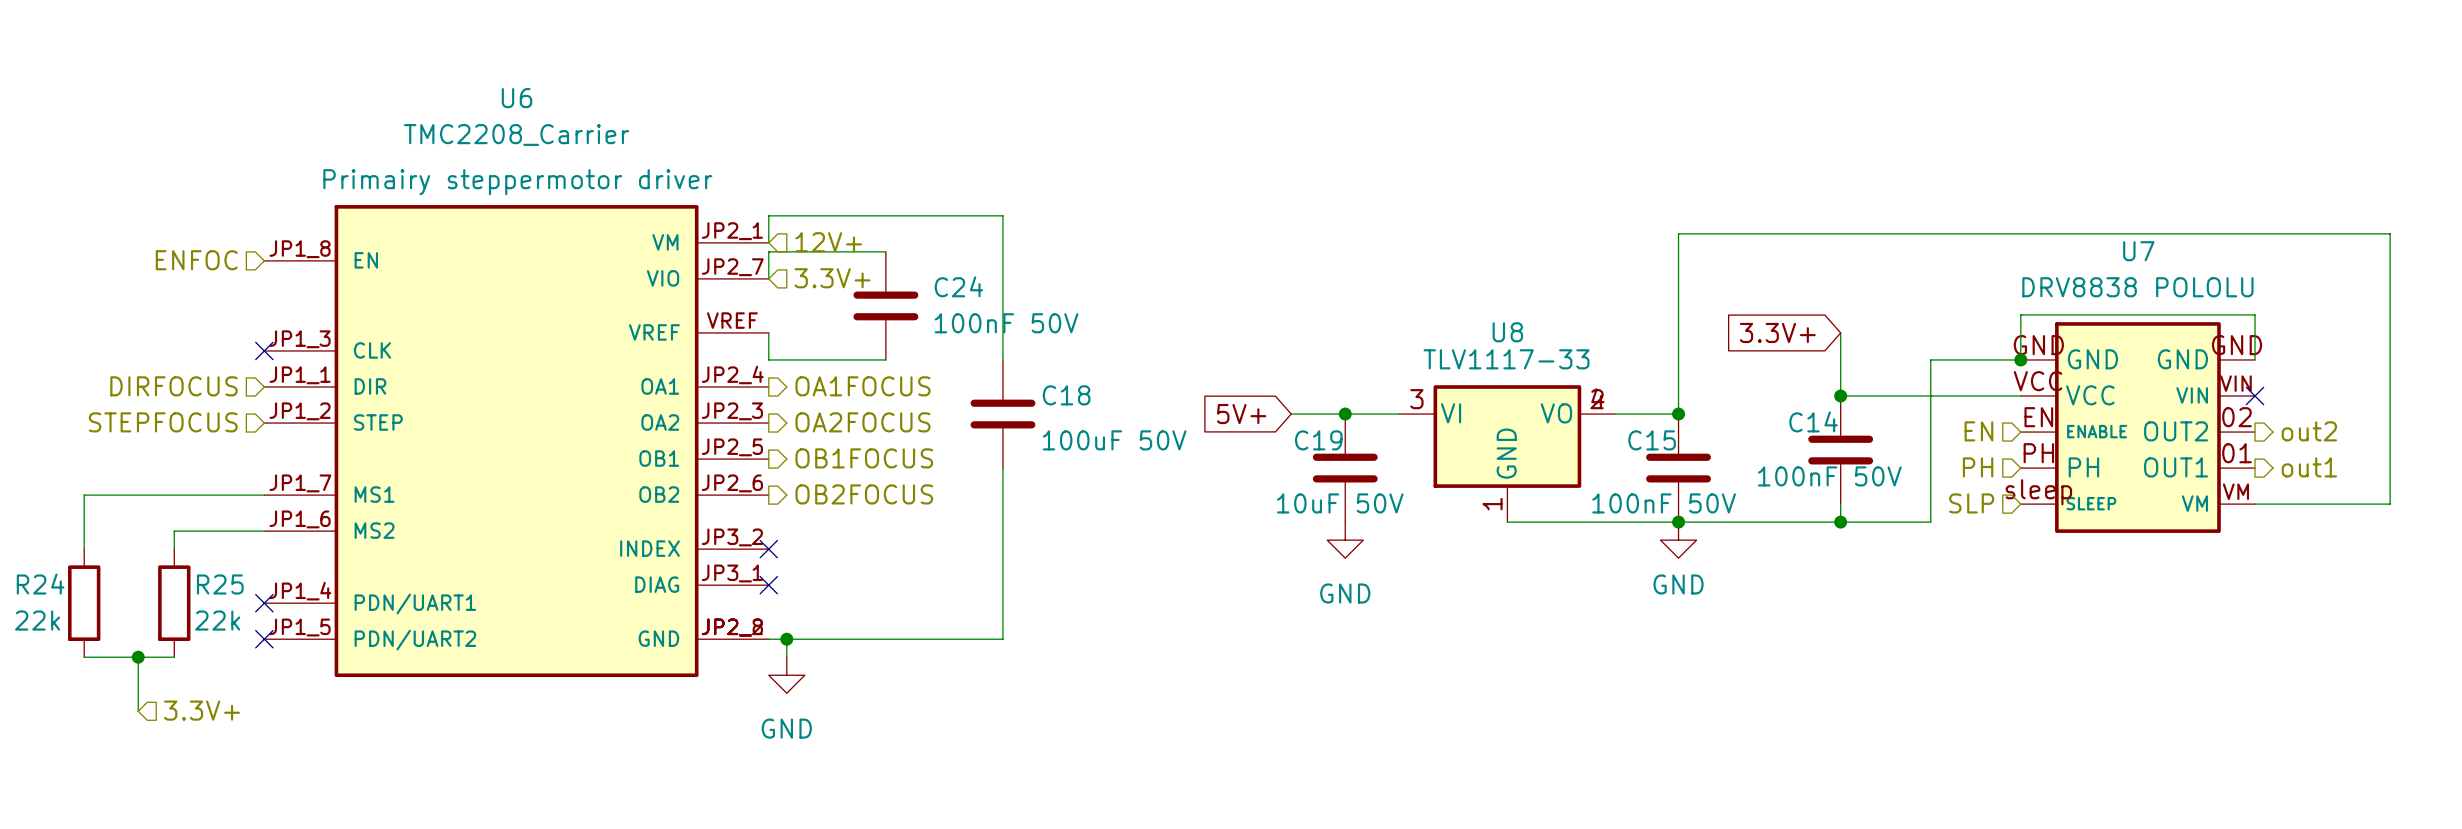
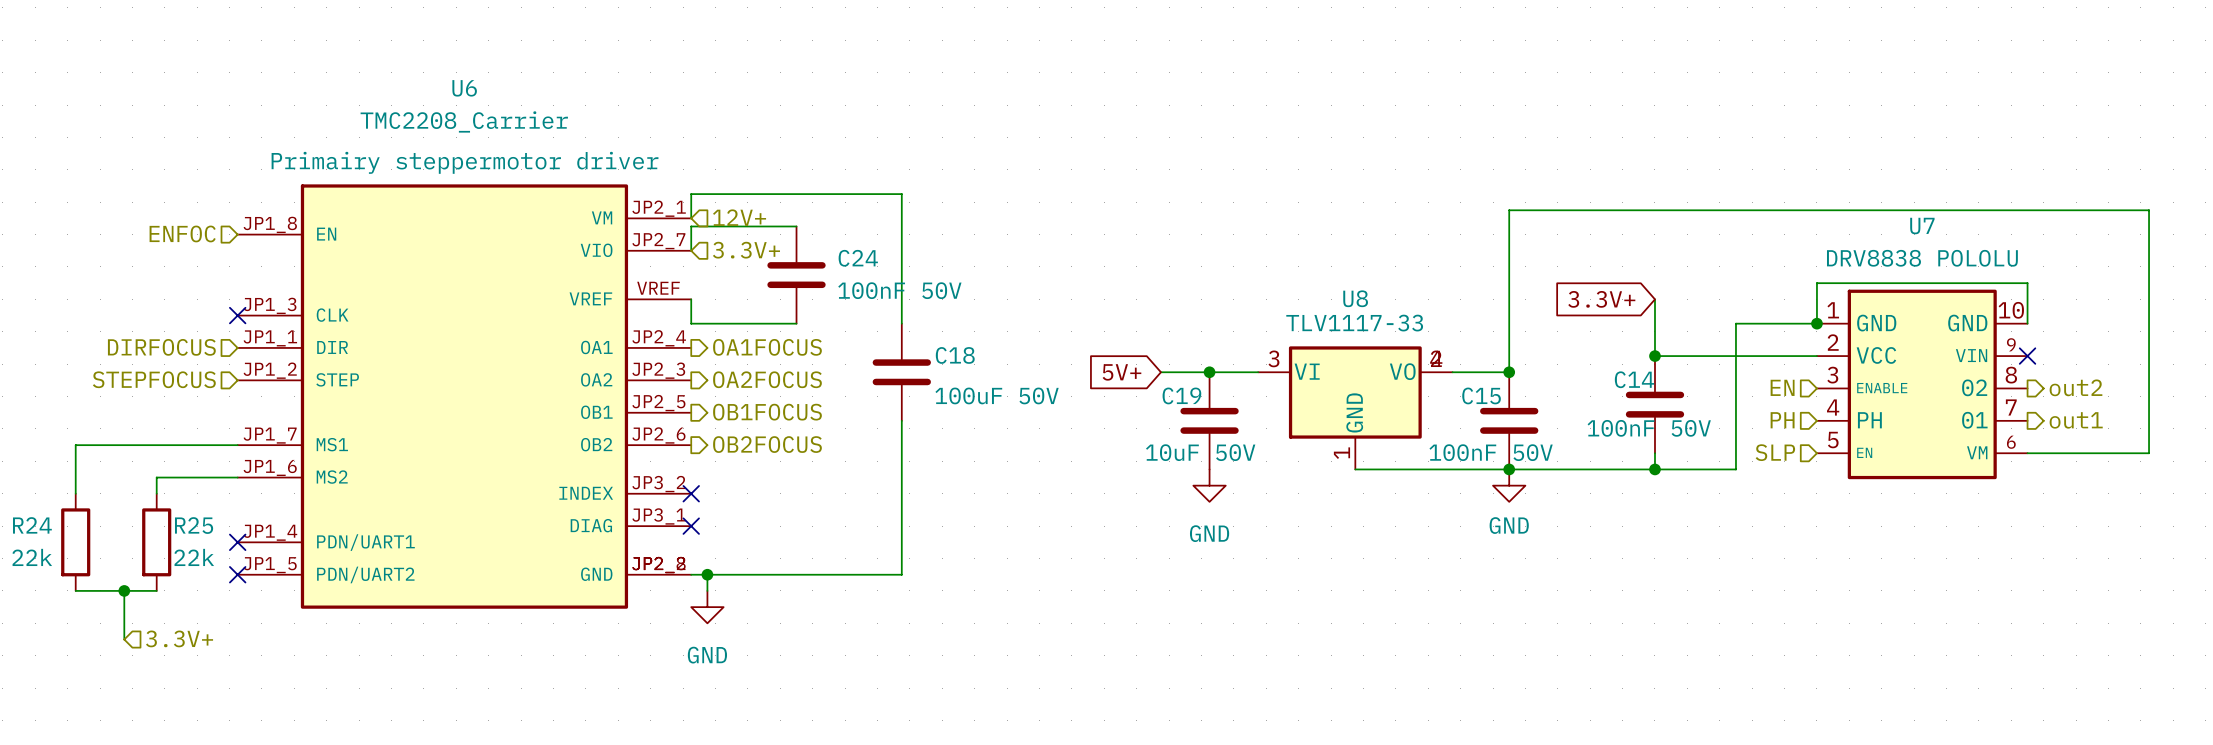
U7 symbol: [2020, 322, 2256, 533] -> [1816, 289, 2028, 480]

